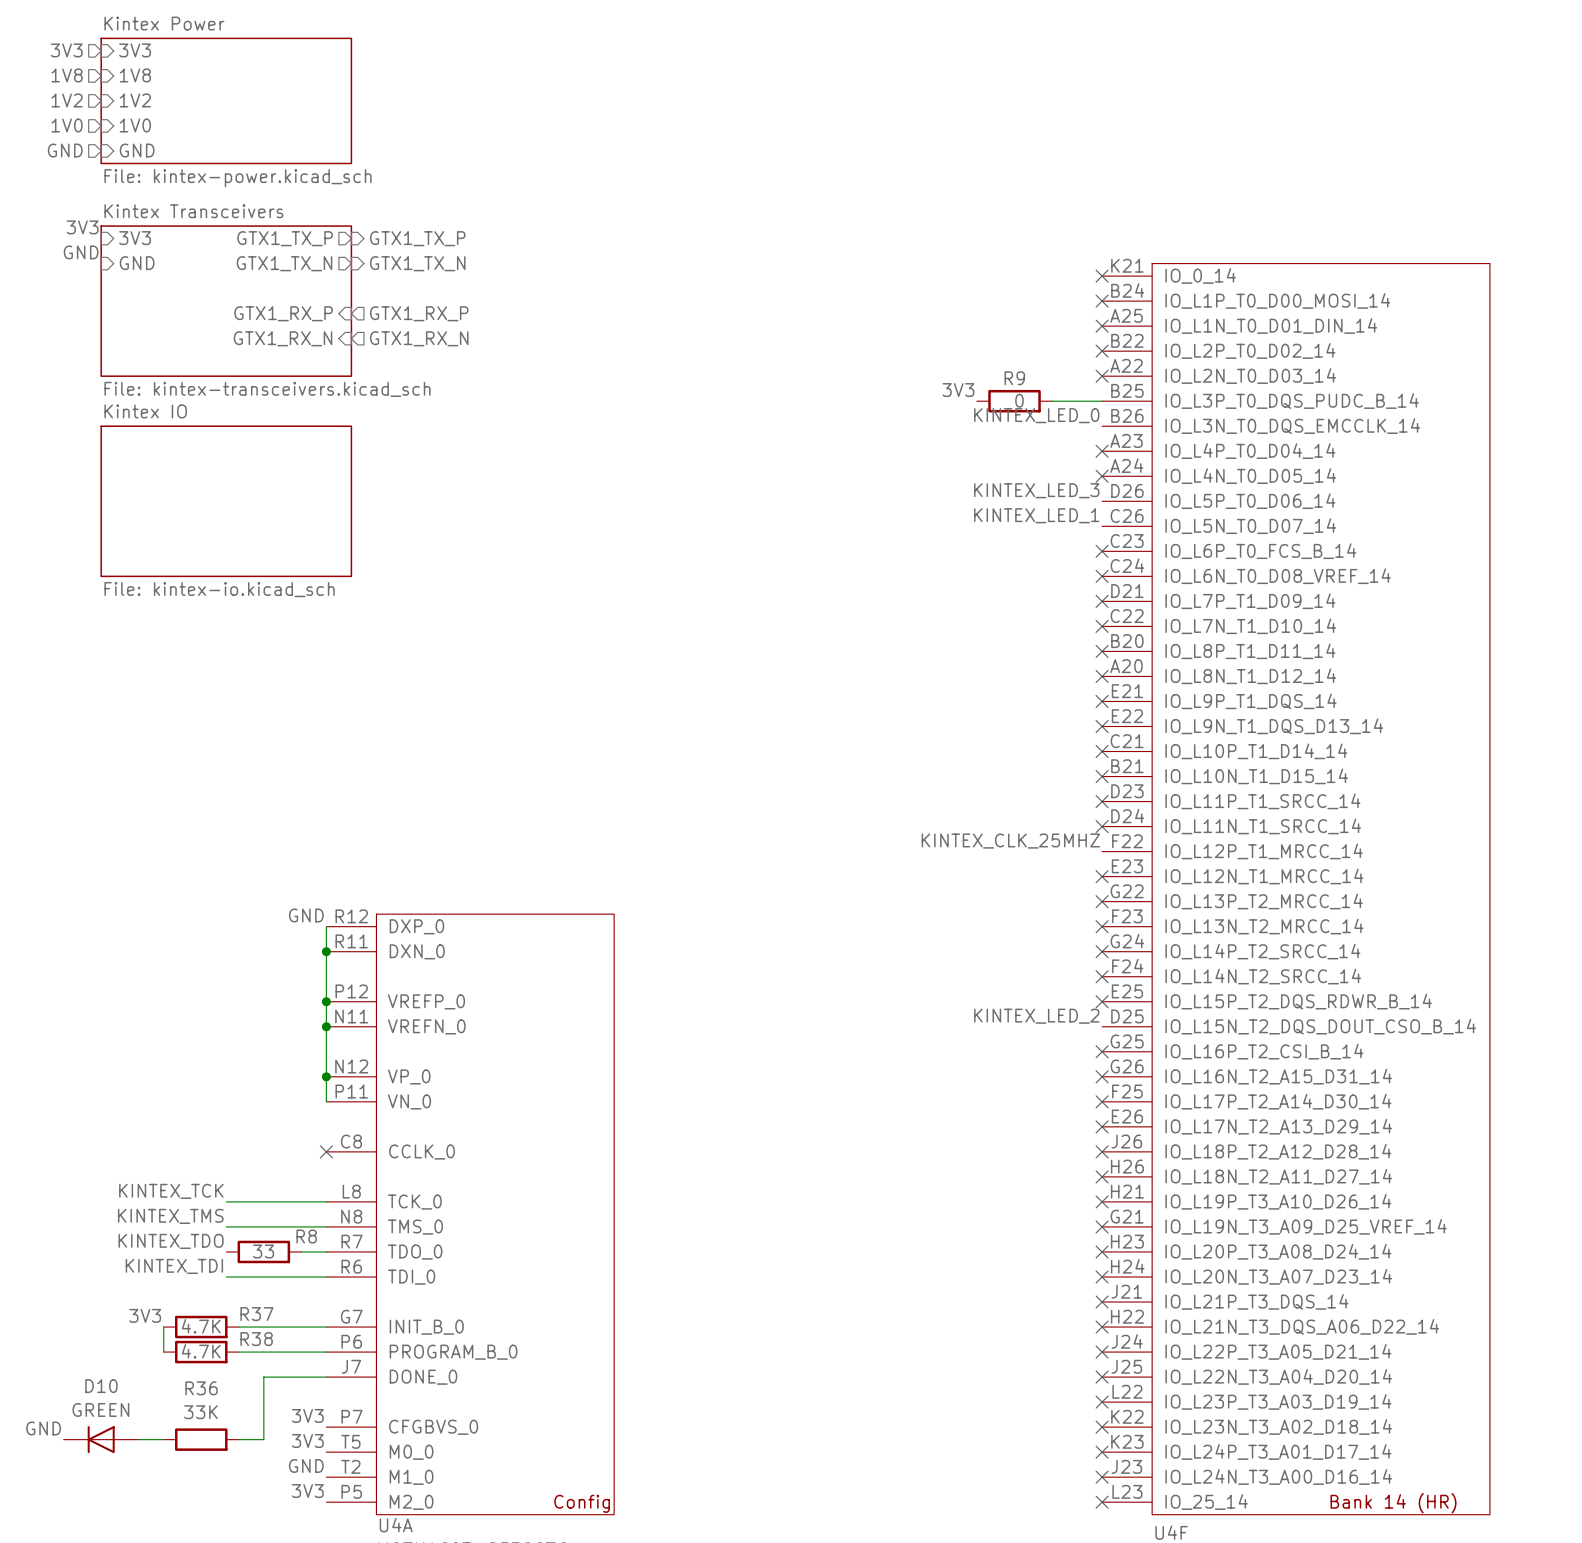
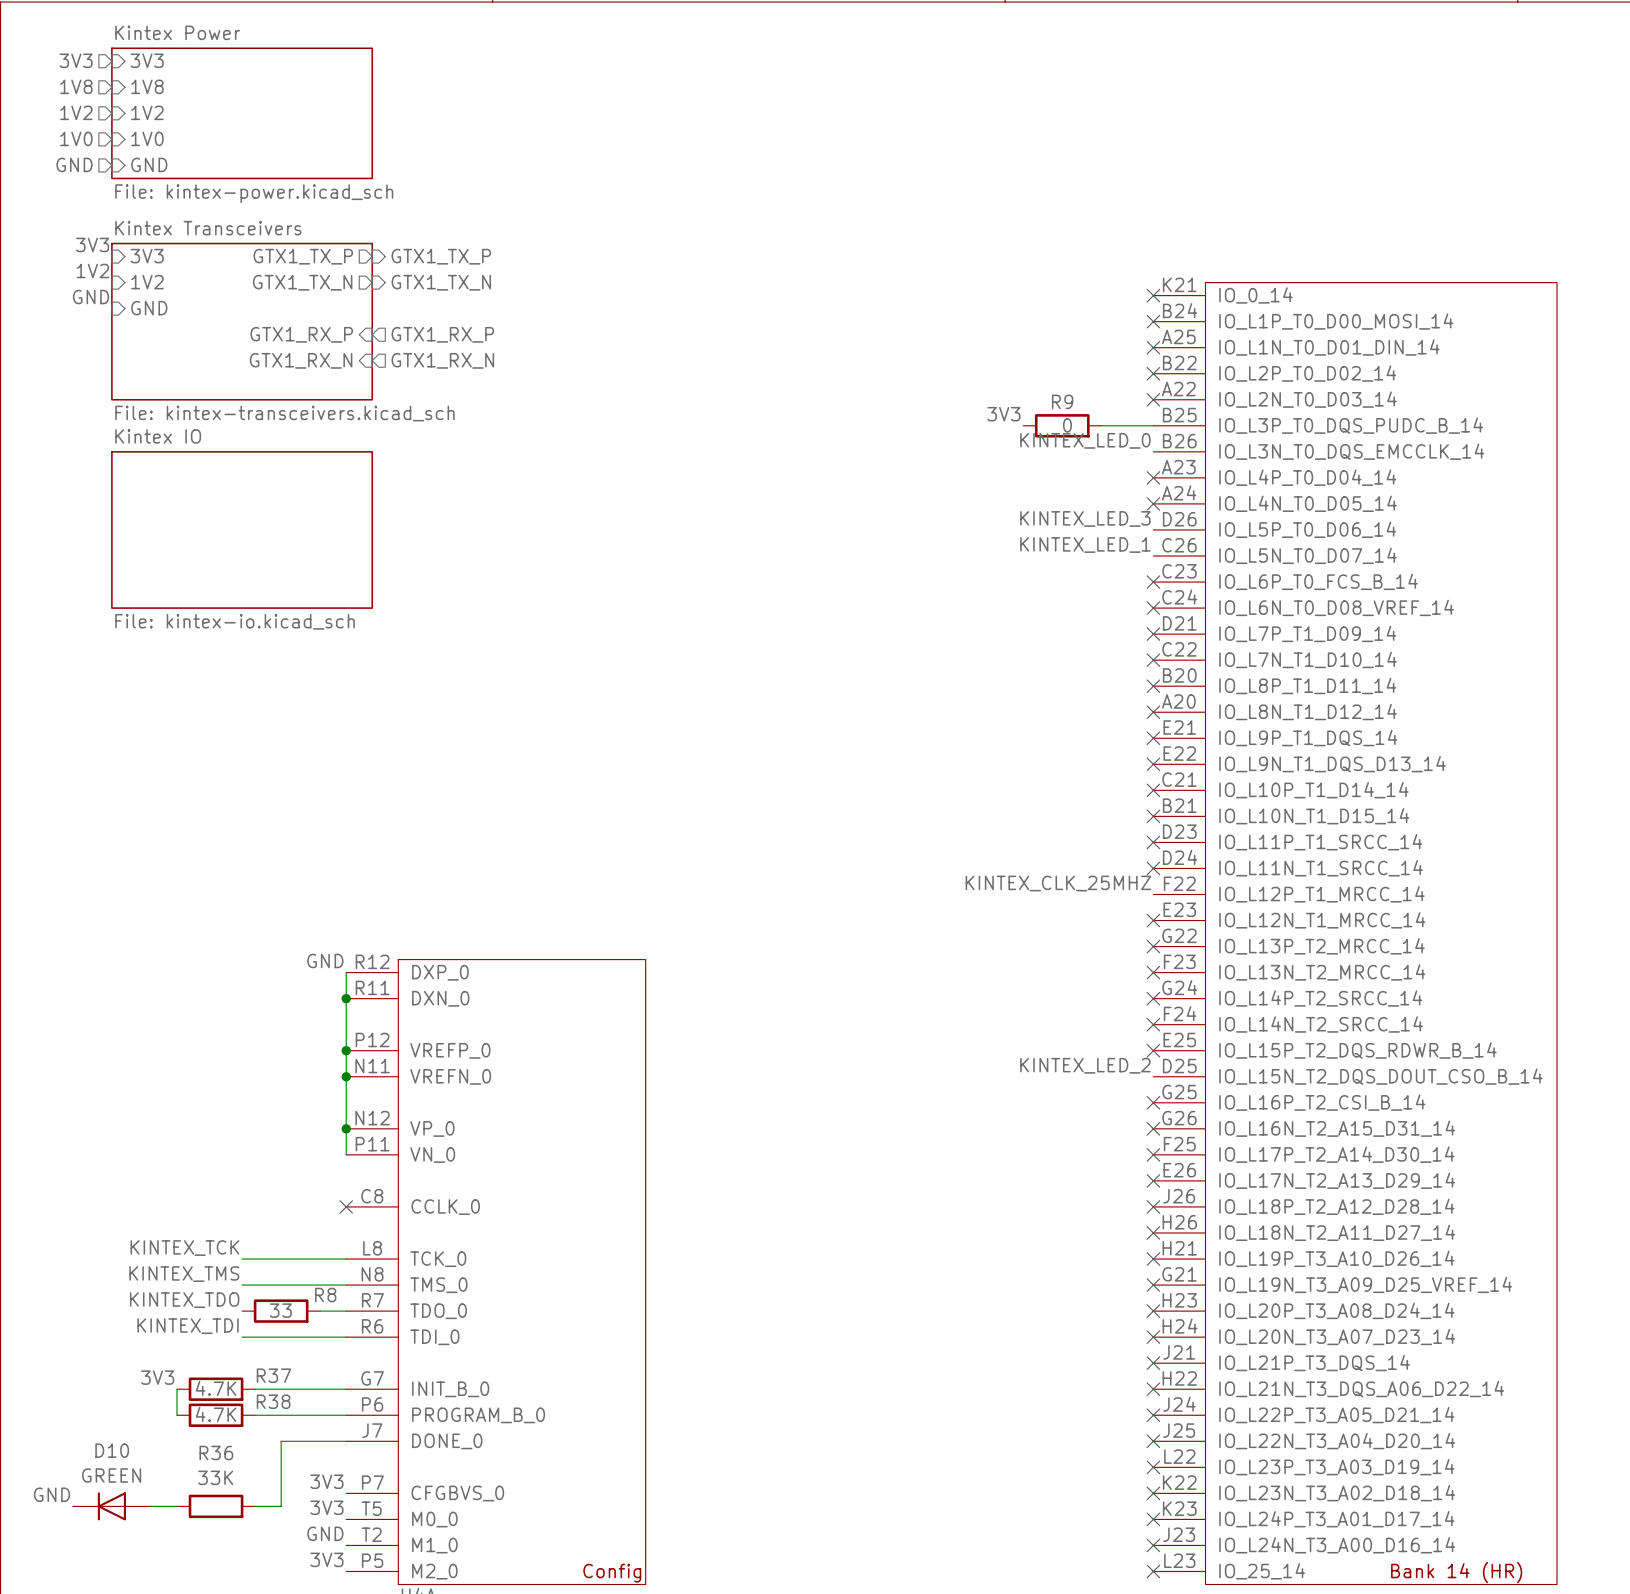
label: GND (81, 252) -> 1V2 (92, 270)
sheet pin: GND (137, 263) -> 1V2 (147, 282)
label: none -> GND (91, 297)
sheet pin: none -> GND (149, 308)

